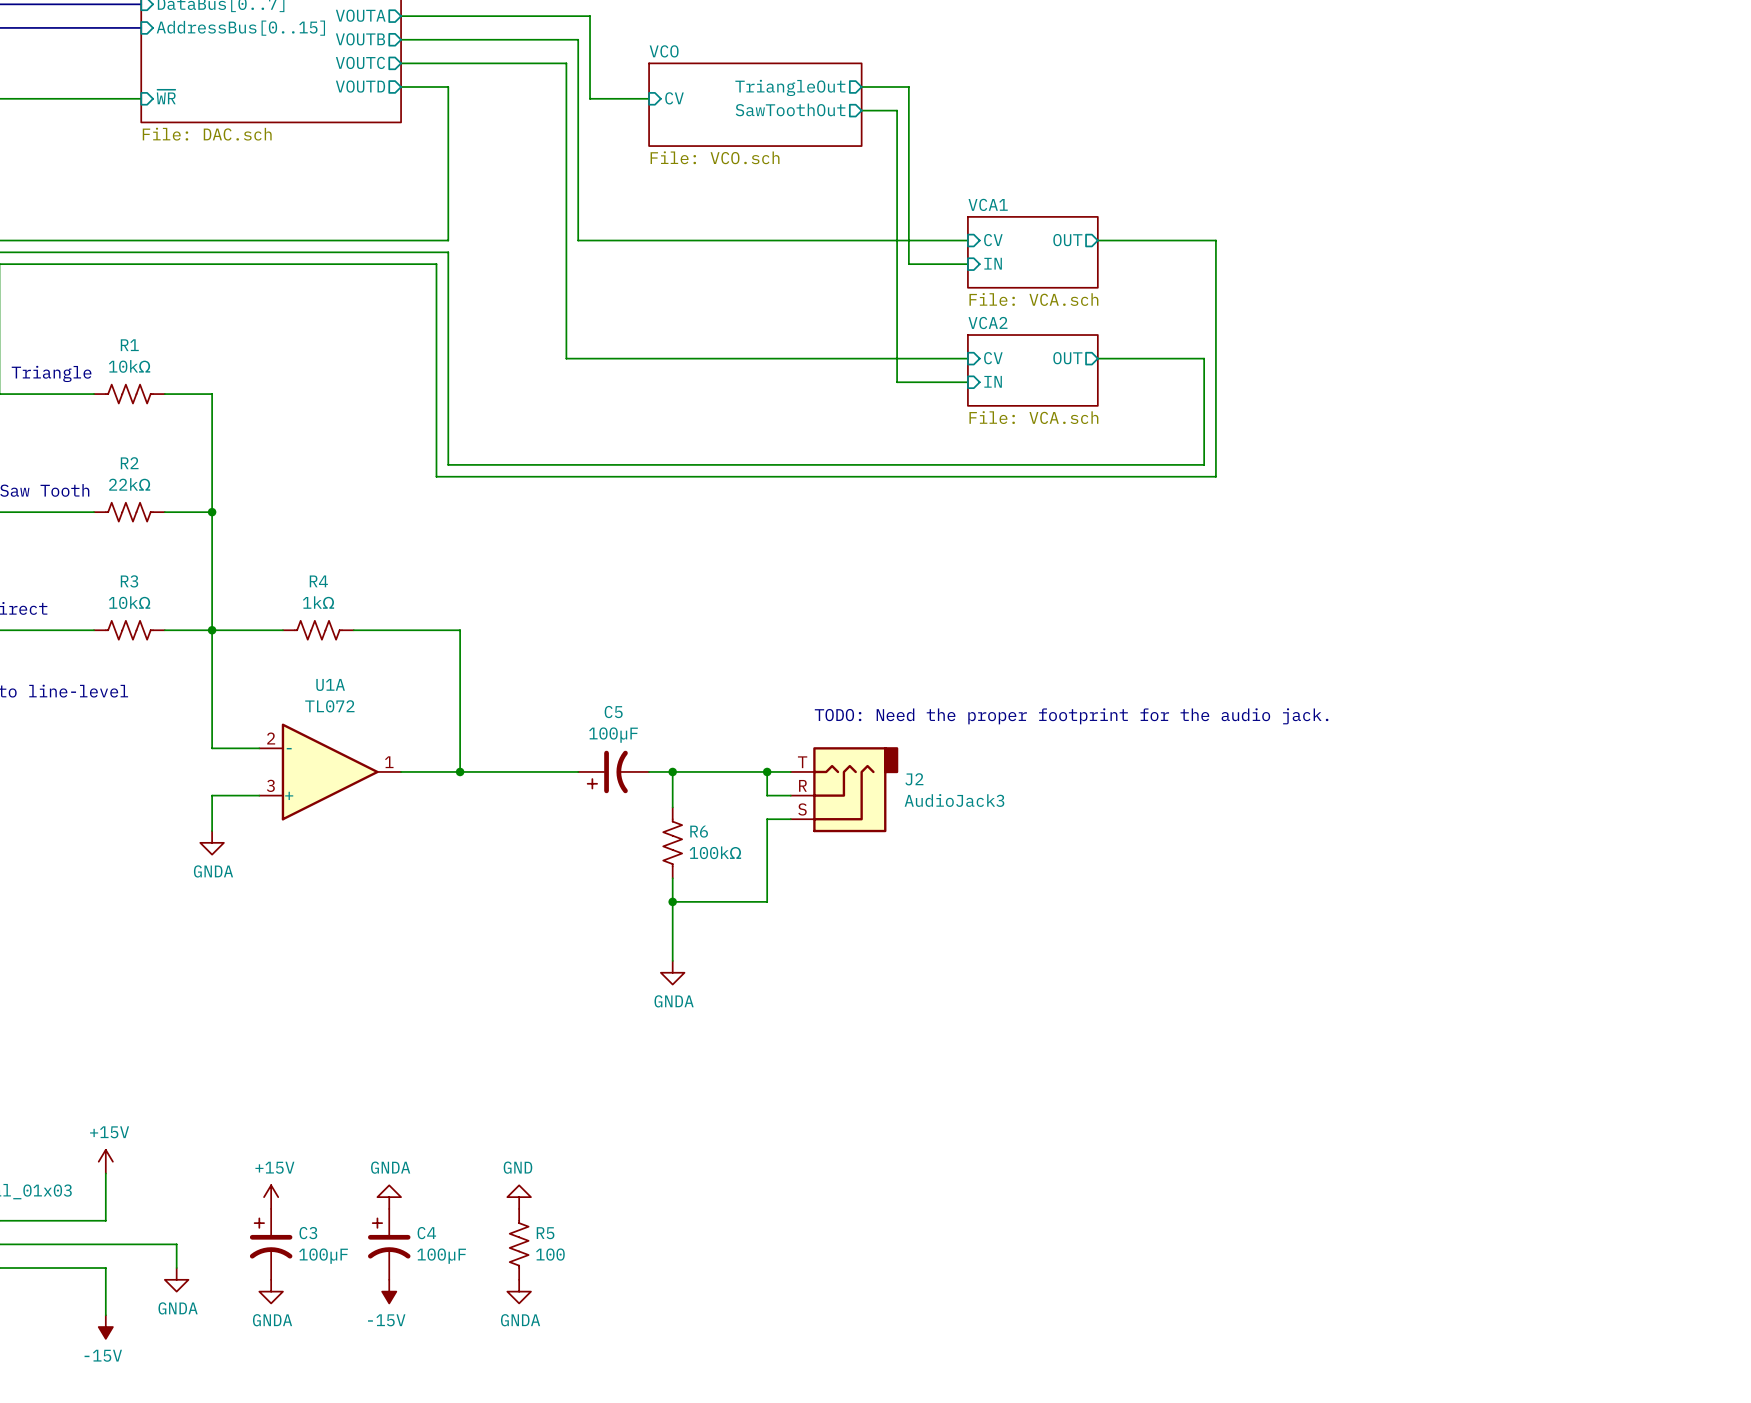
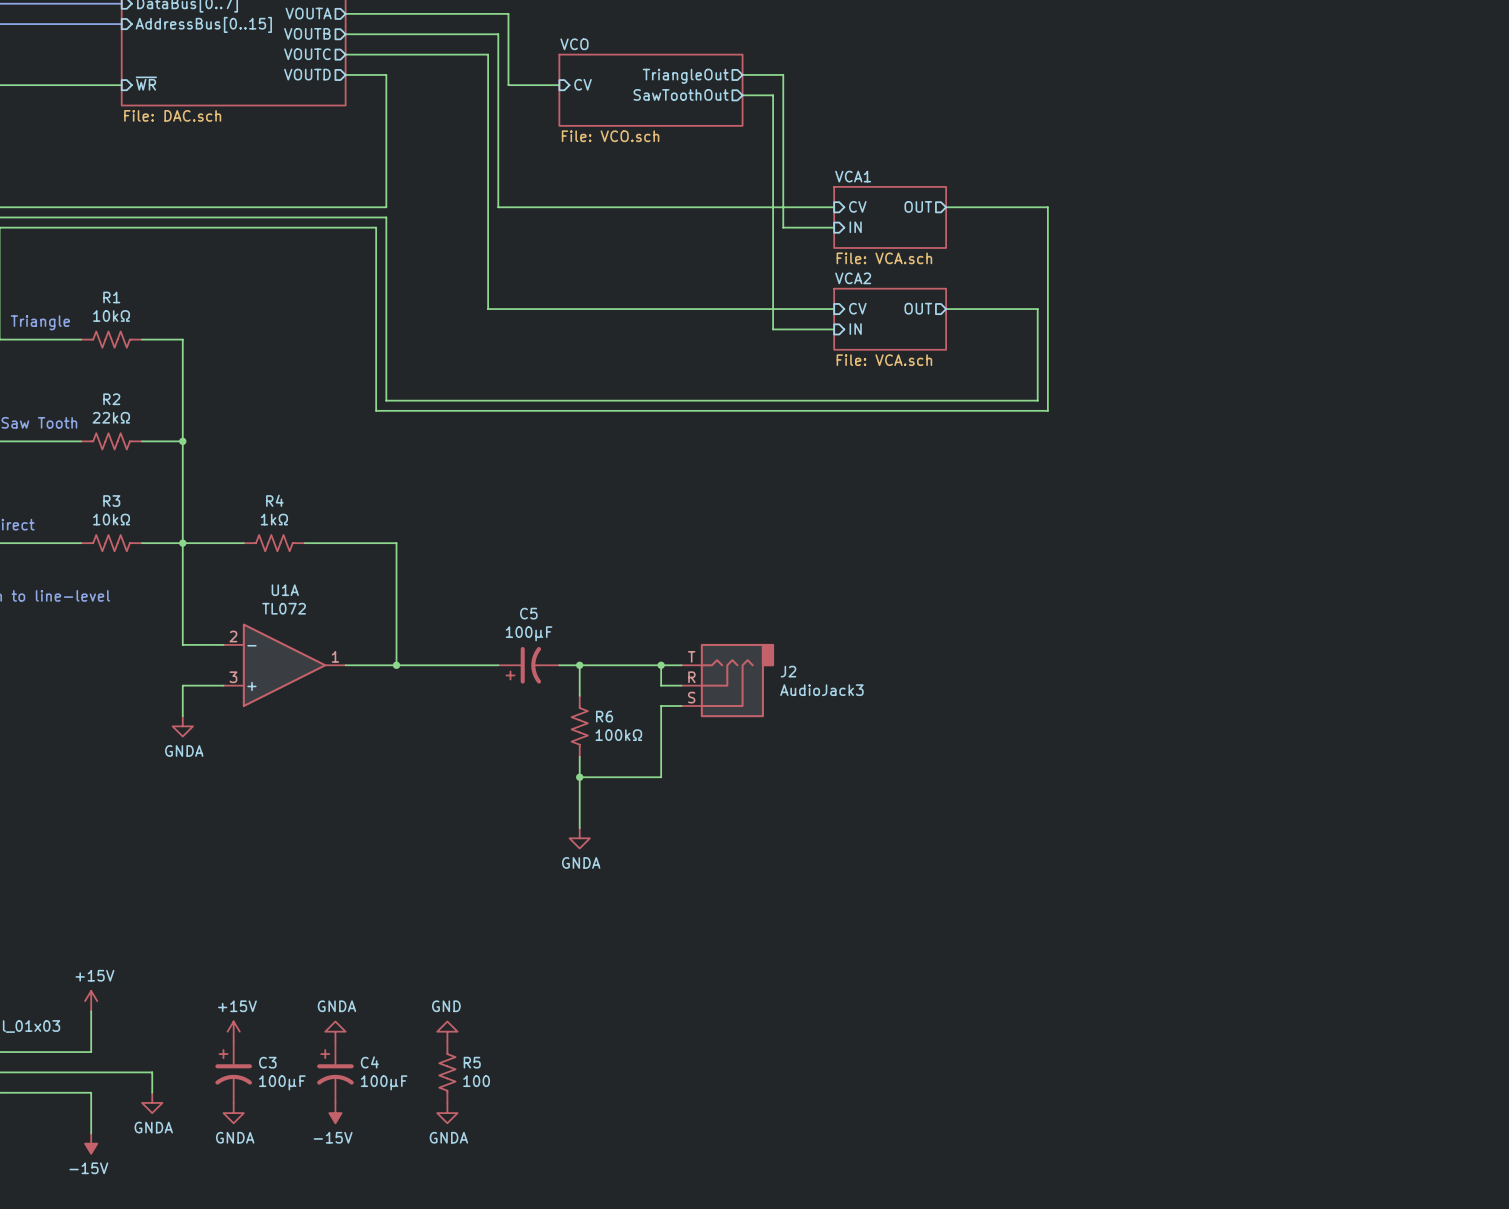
text: TODO: Need the proper footprint for the audio jack. (1071, 716) -> none

